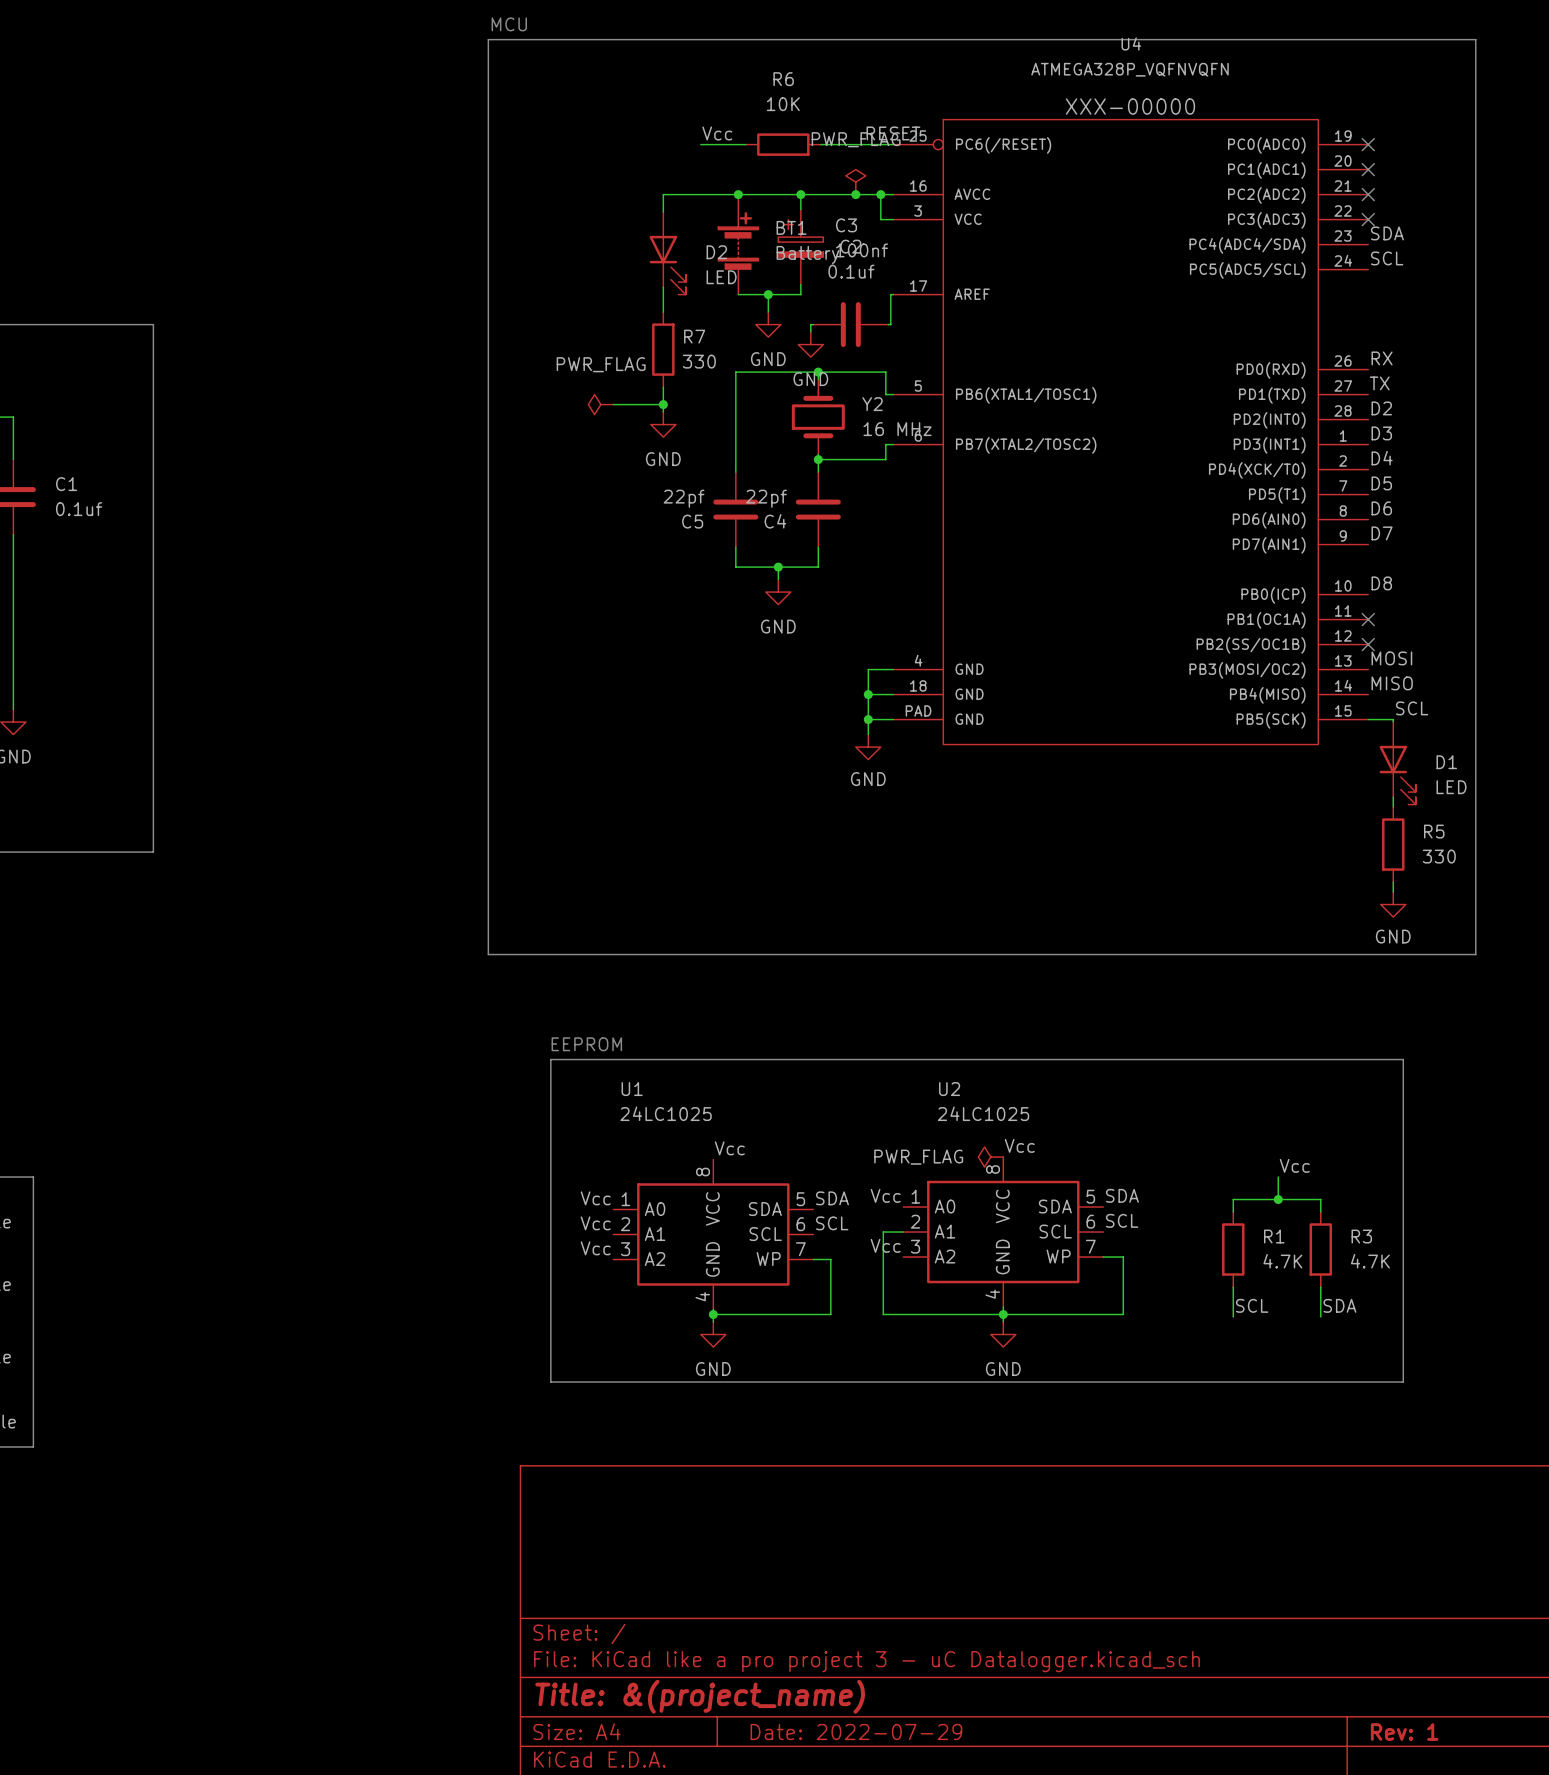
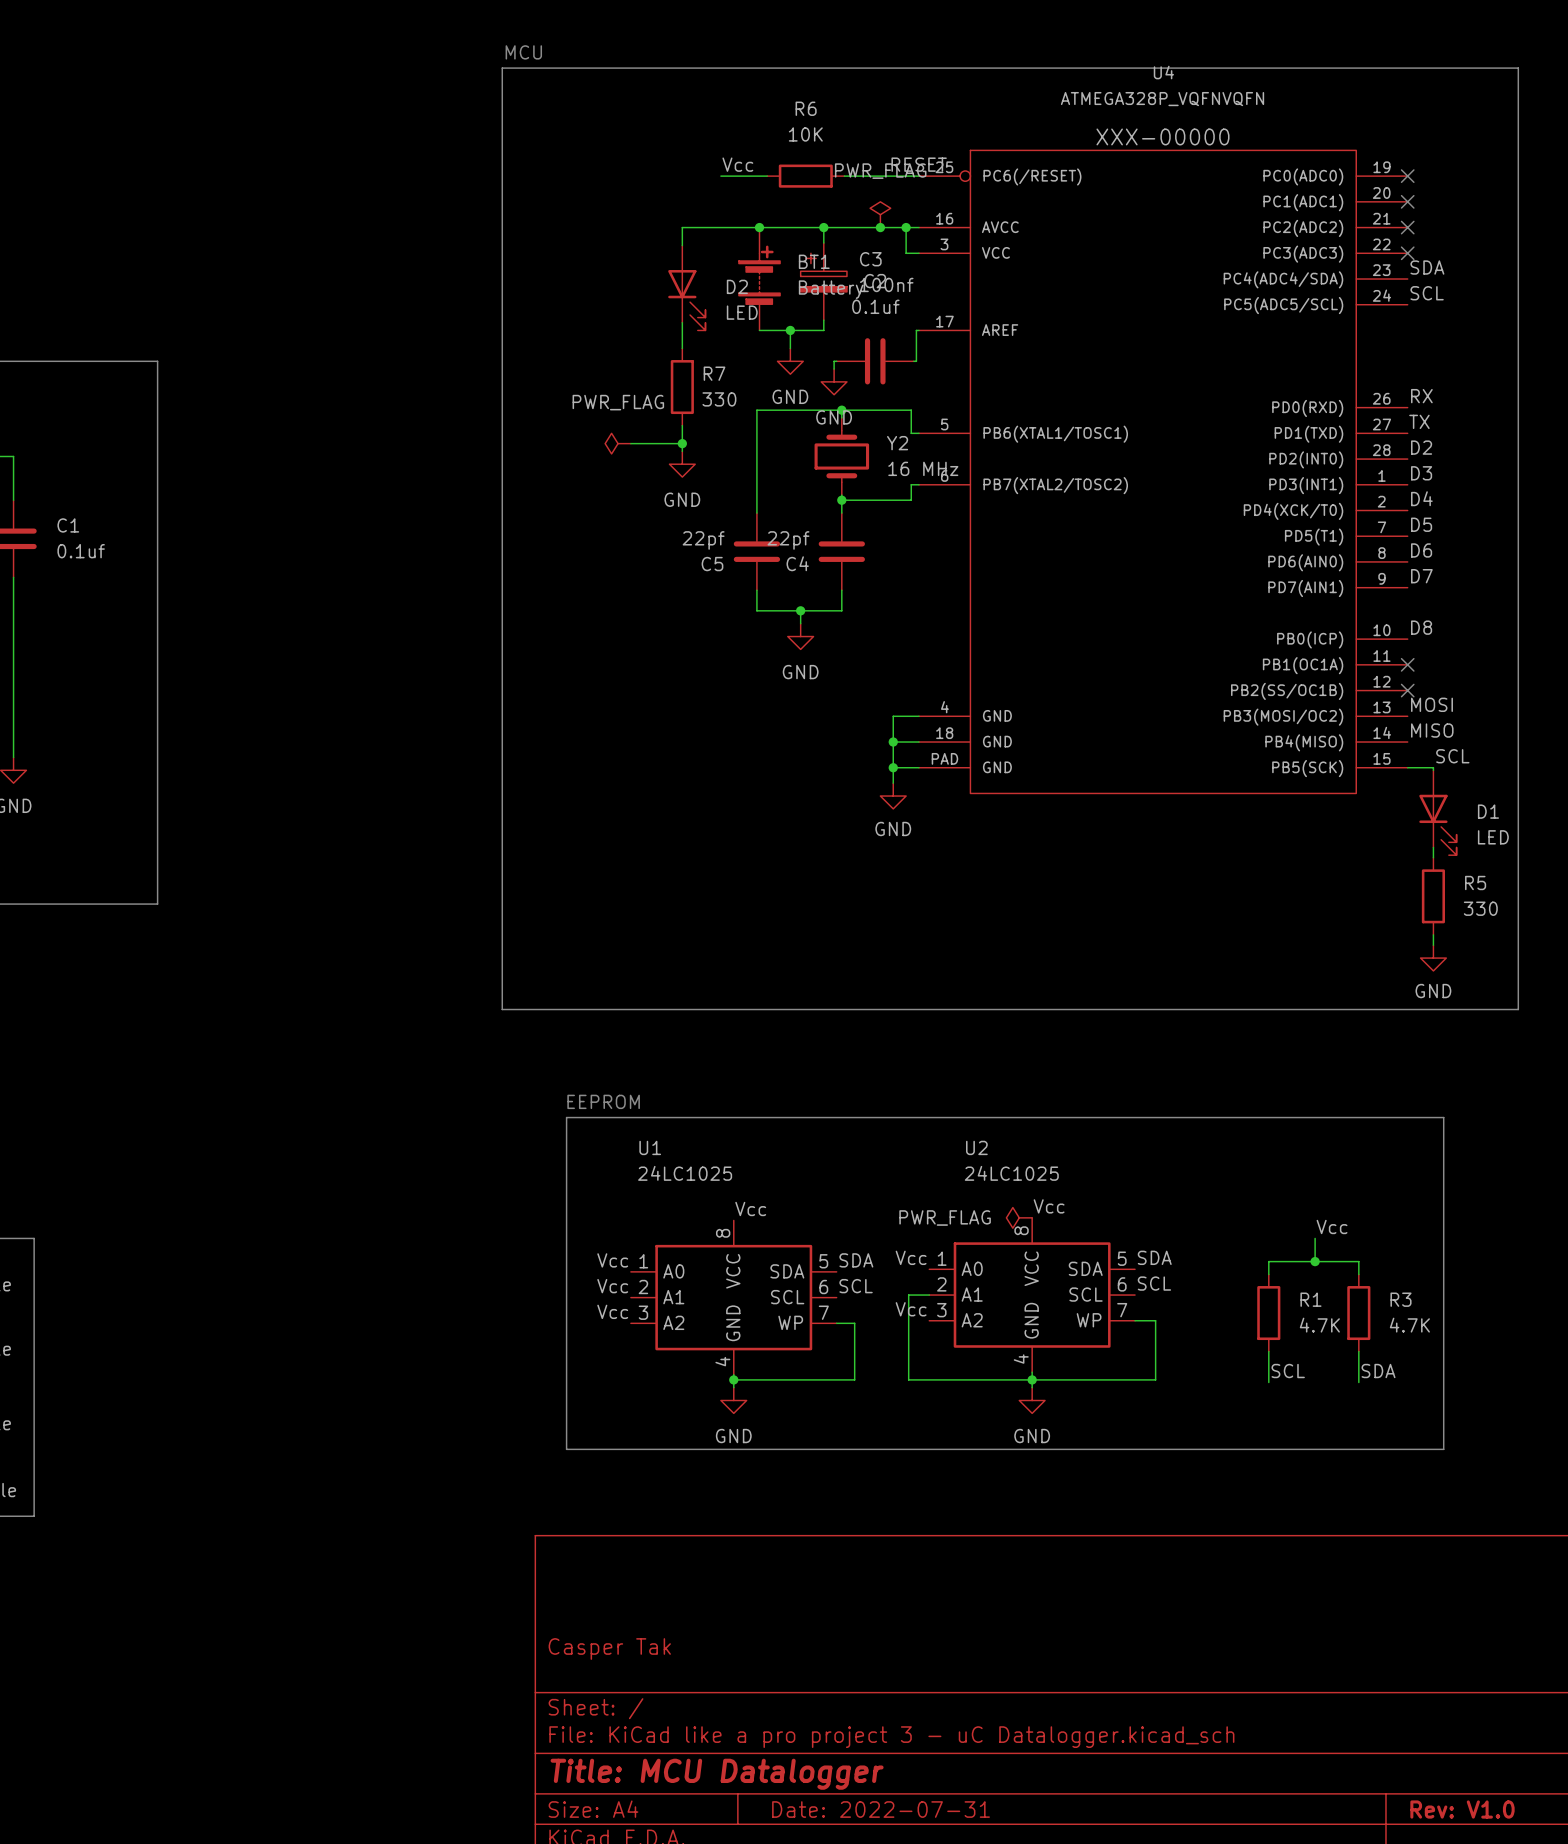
title block: none -> Casper Tak (609, 1649)
title block: Title: &(project_name) (700, 1696) -> Title: MCU Datalogger (717, 1774)
title block: Date: 2022-07-29 (856, 1732) -> Date: 2022-07-31 (881, 1809)
title block: Rev: 1 (1404, 1732) -> Rev: V1.0 (1462, 1809)

